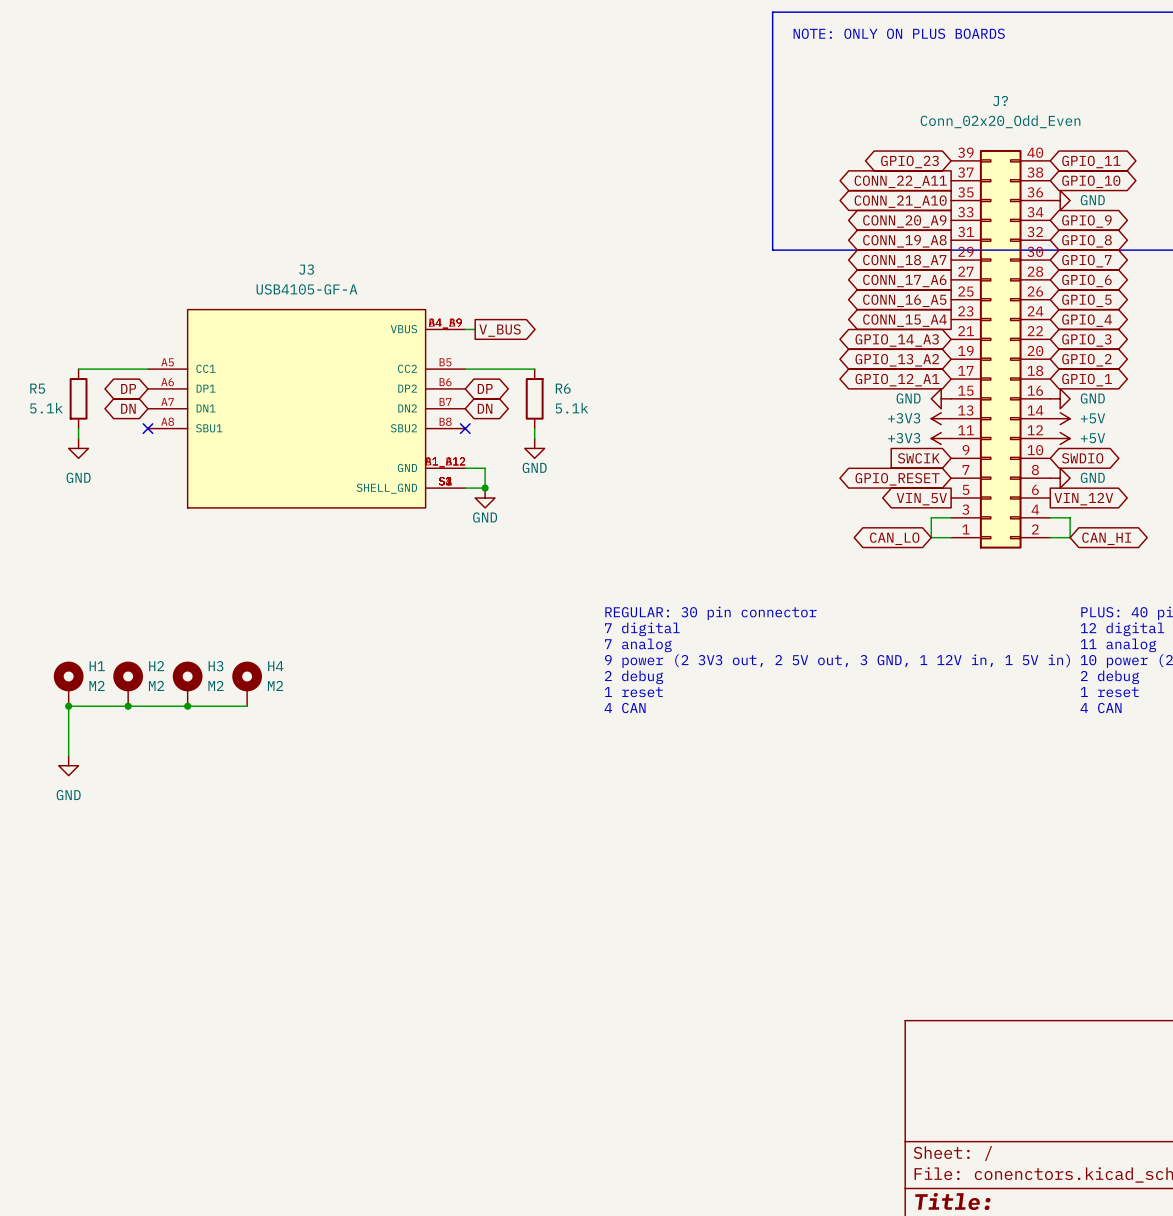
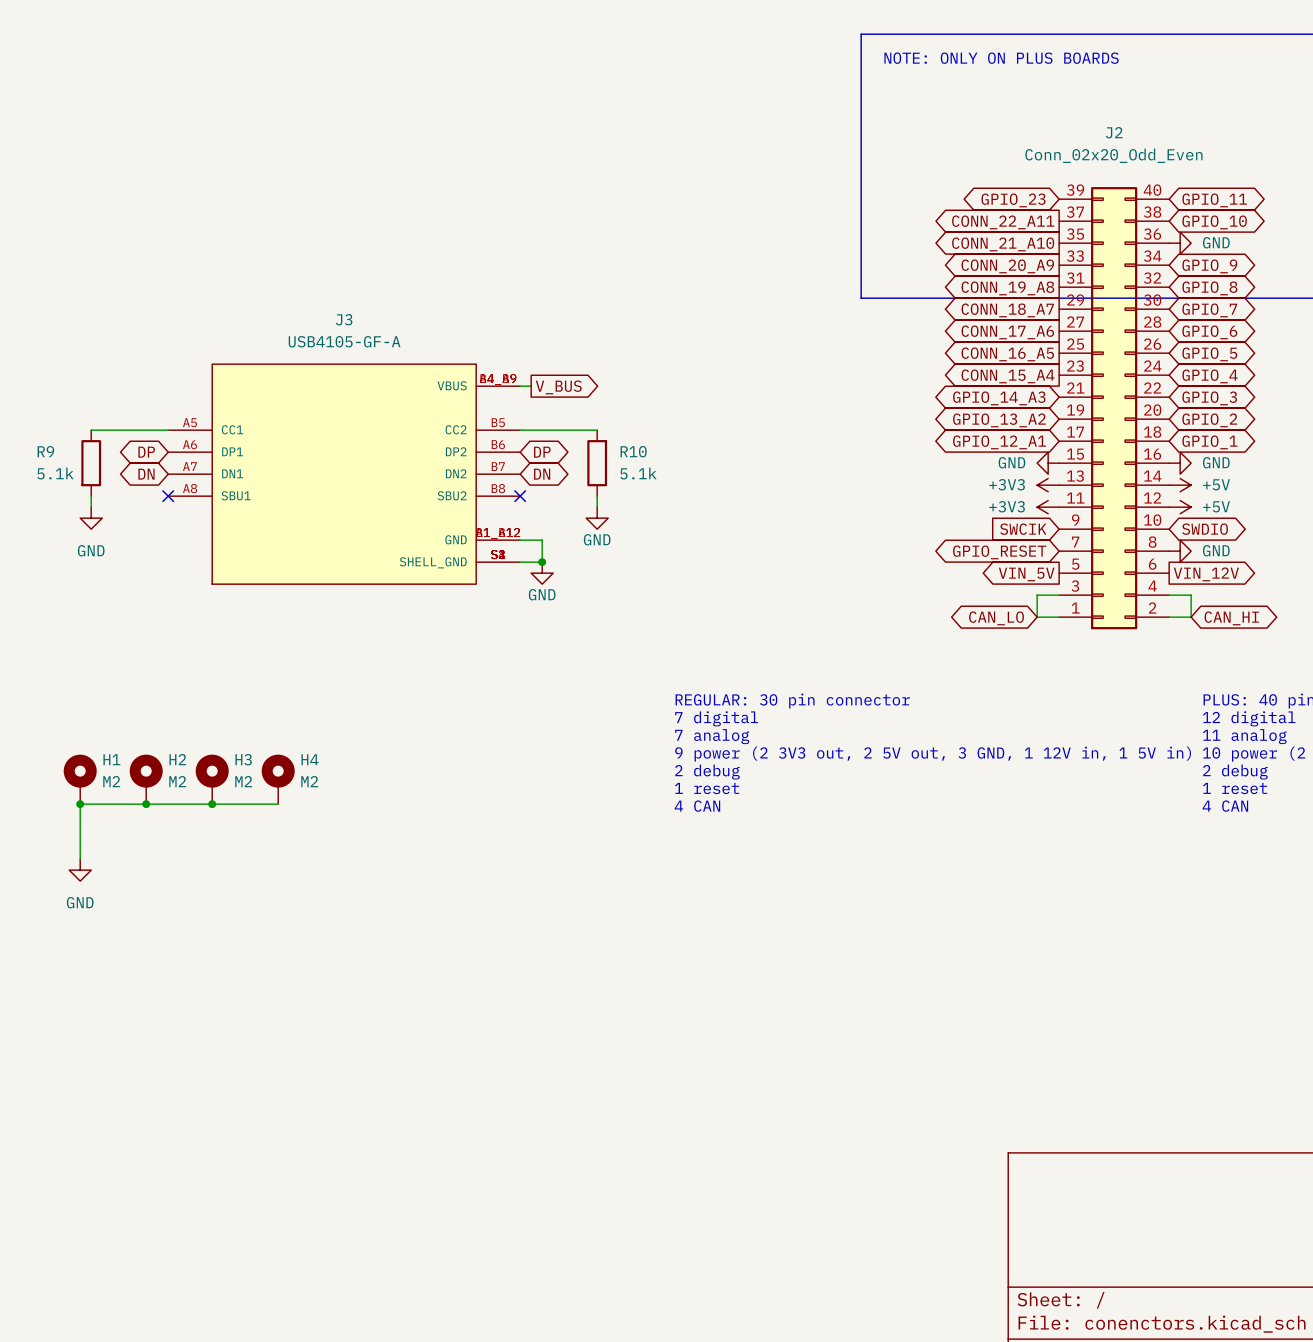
J? name: J? (1000, 101) -> J2 (1114, 132)
R5 name: R5 (37, 388) -> R9 (45, 451)
R6 name: R6 (563, 388) -> R10 (633, 451)

